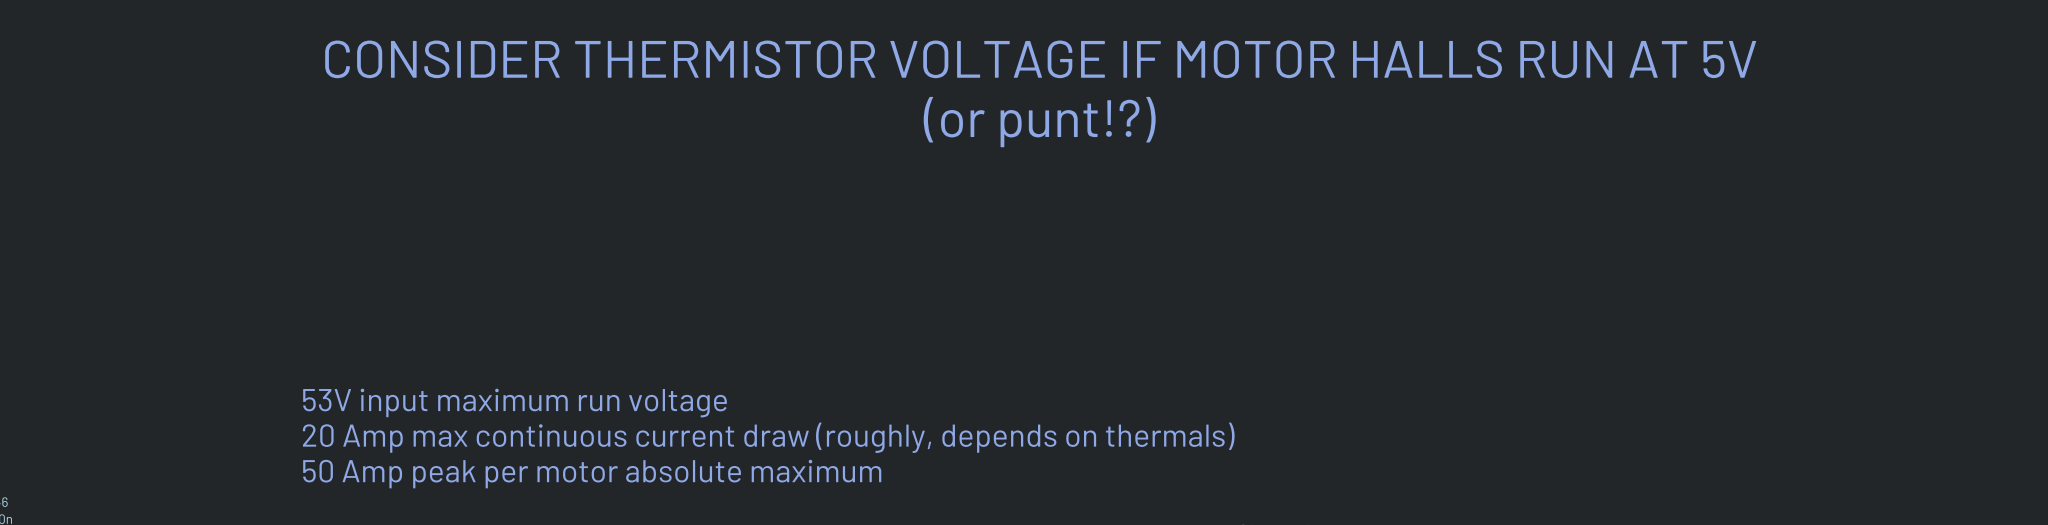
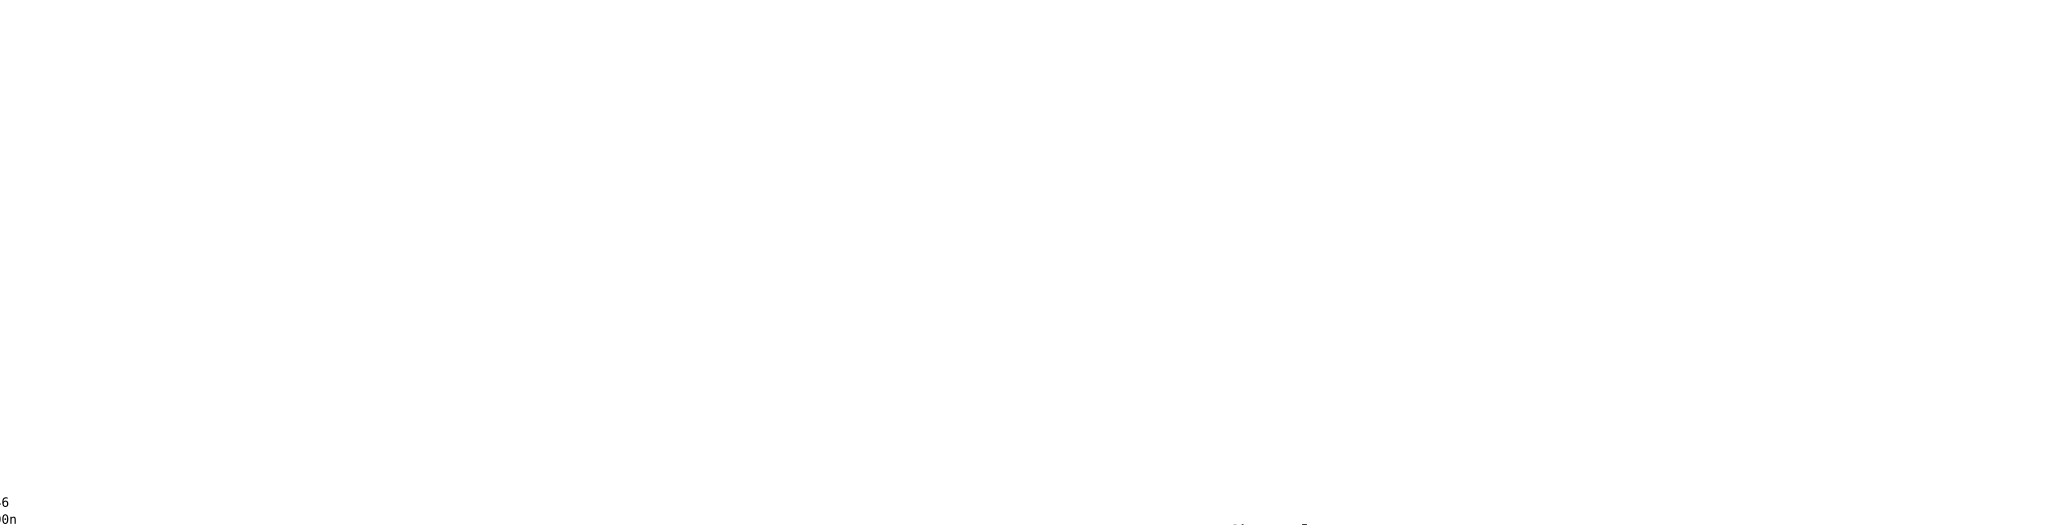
text: CONSIDER THERMISTOR VOLTAGE IF MOTOR HALLS RUN AT 5V (1040, 59) -> none
text: (or punt!?) (1039, 122) -> none
text: 53V input maximum run voltage (515, 403) -> none
text: 20 Amp max continuous current draw (roughly, depends on thermals) (768, 437) -> none
text: 50 Amp peak per motor absolute maximum (592, 474) -> none

